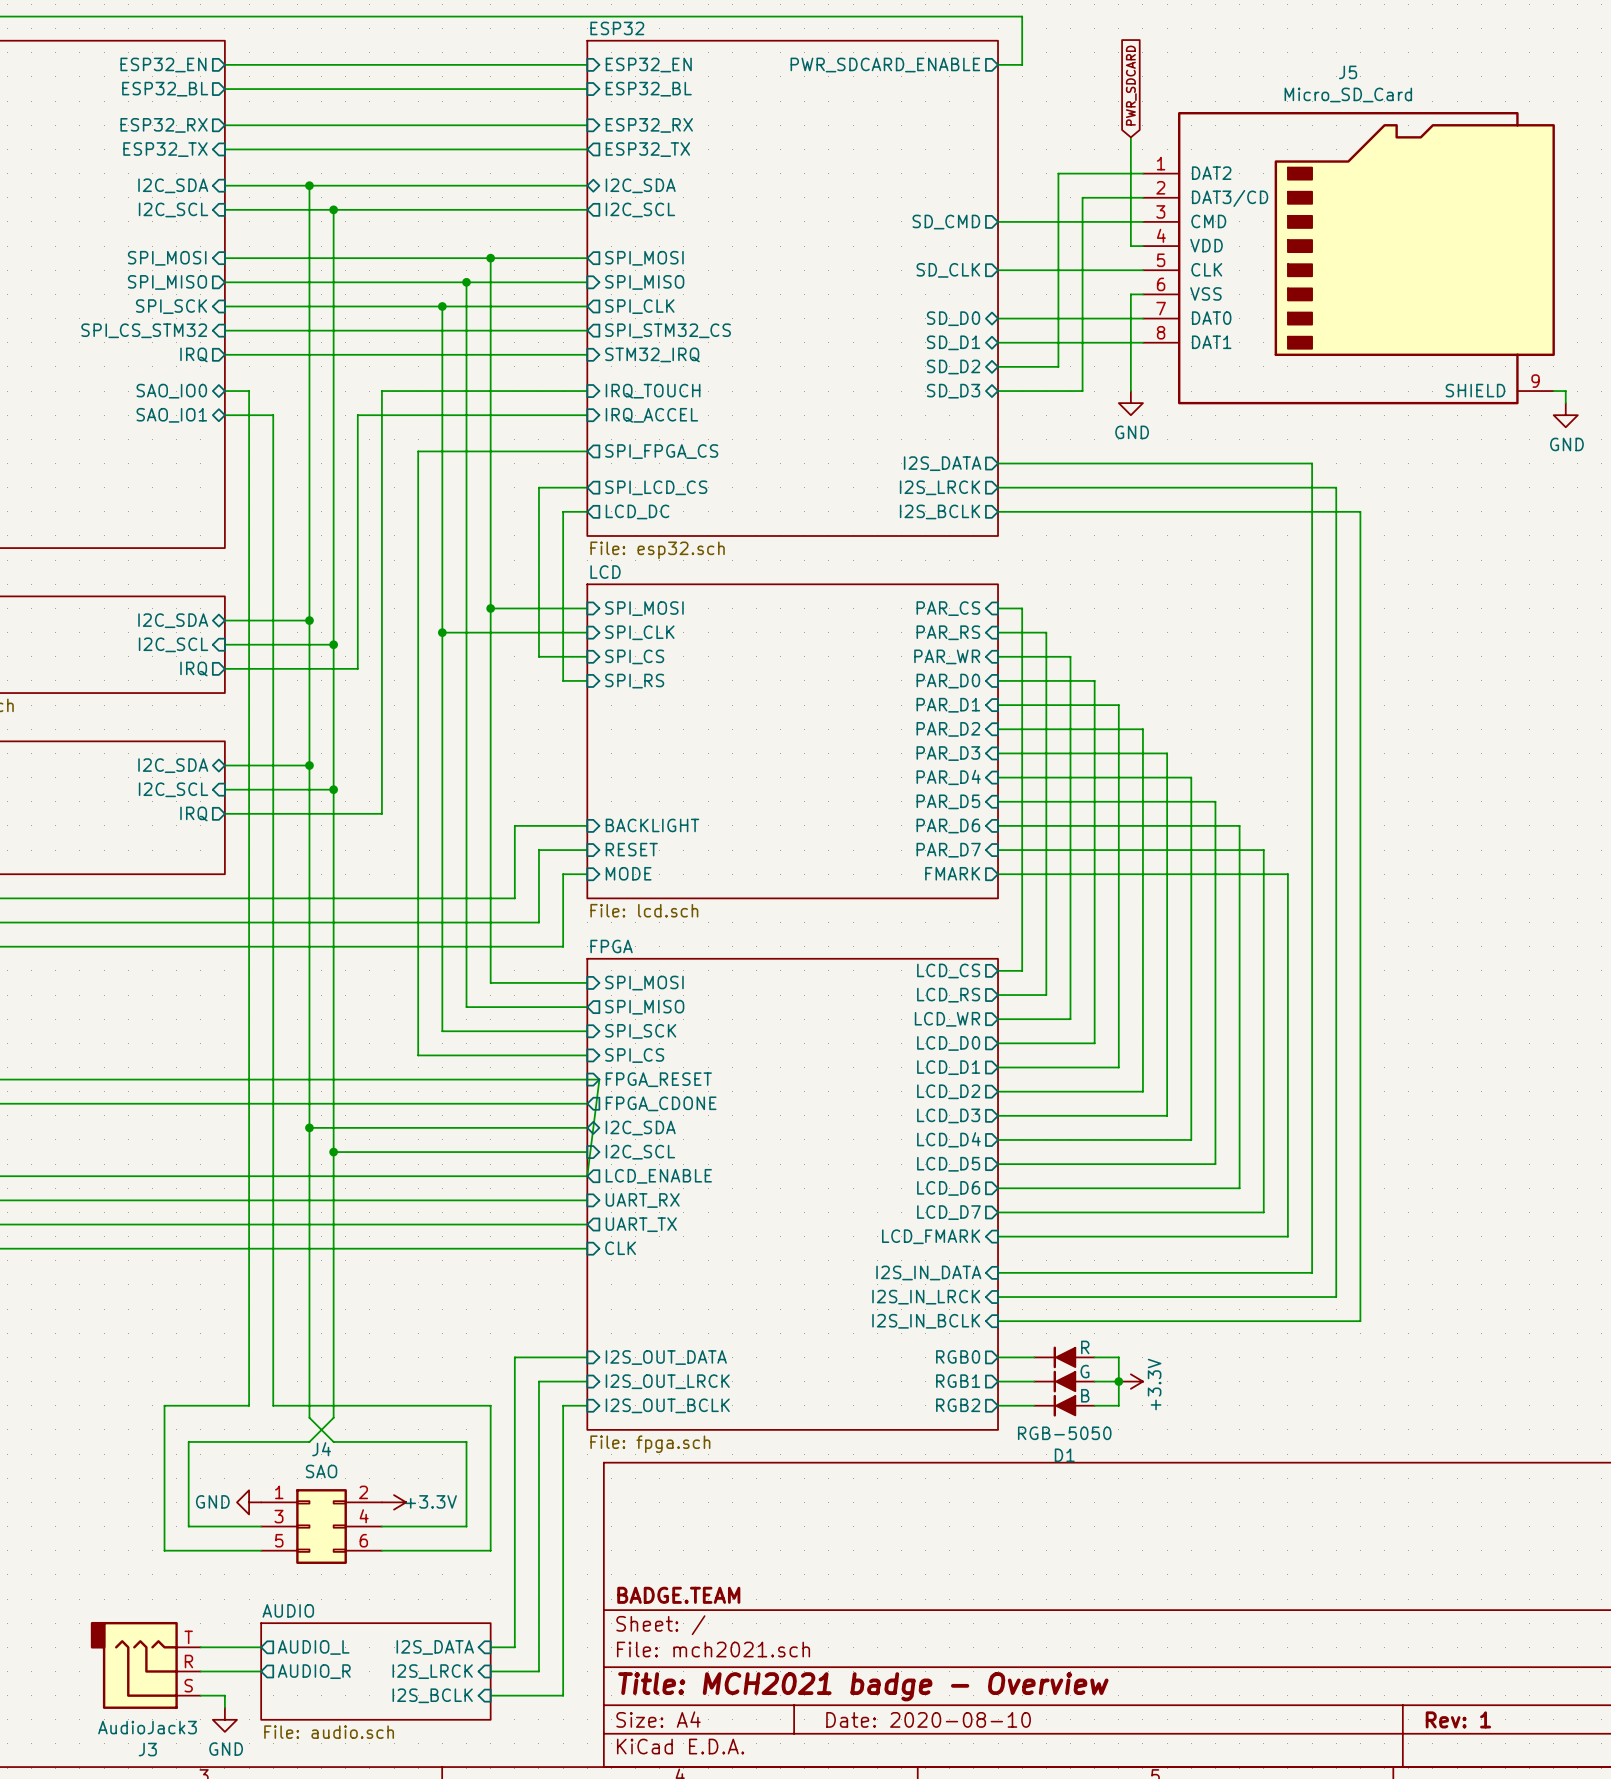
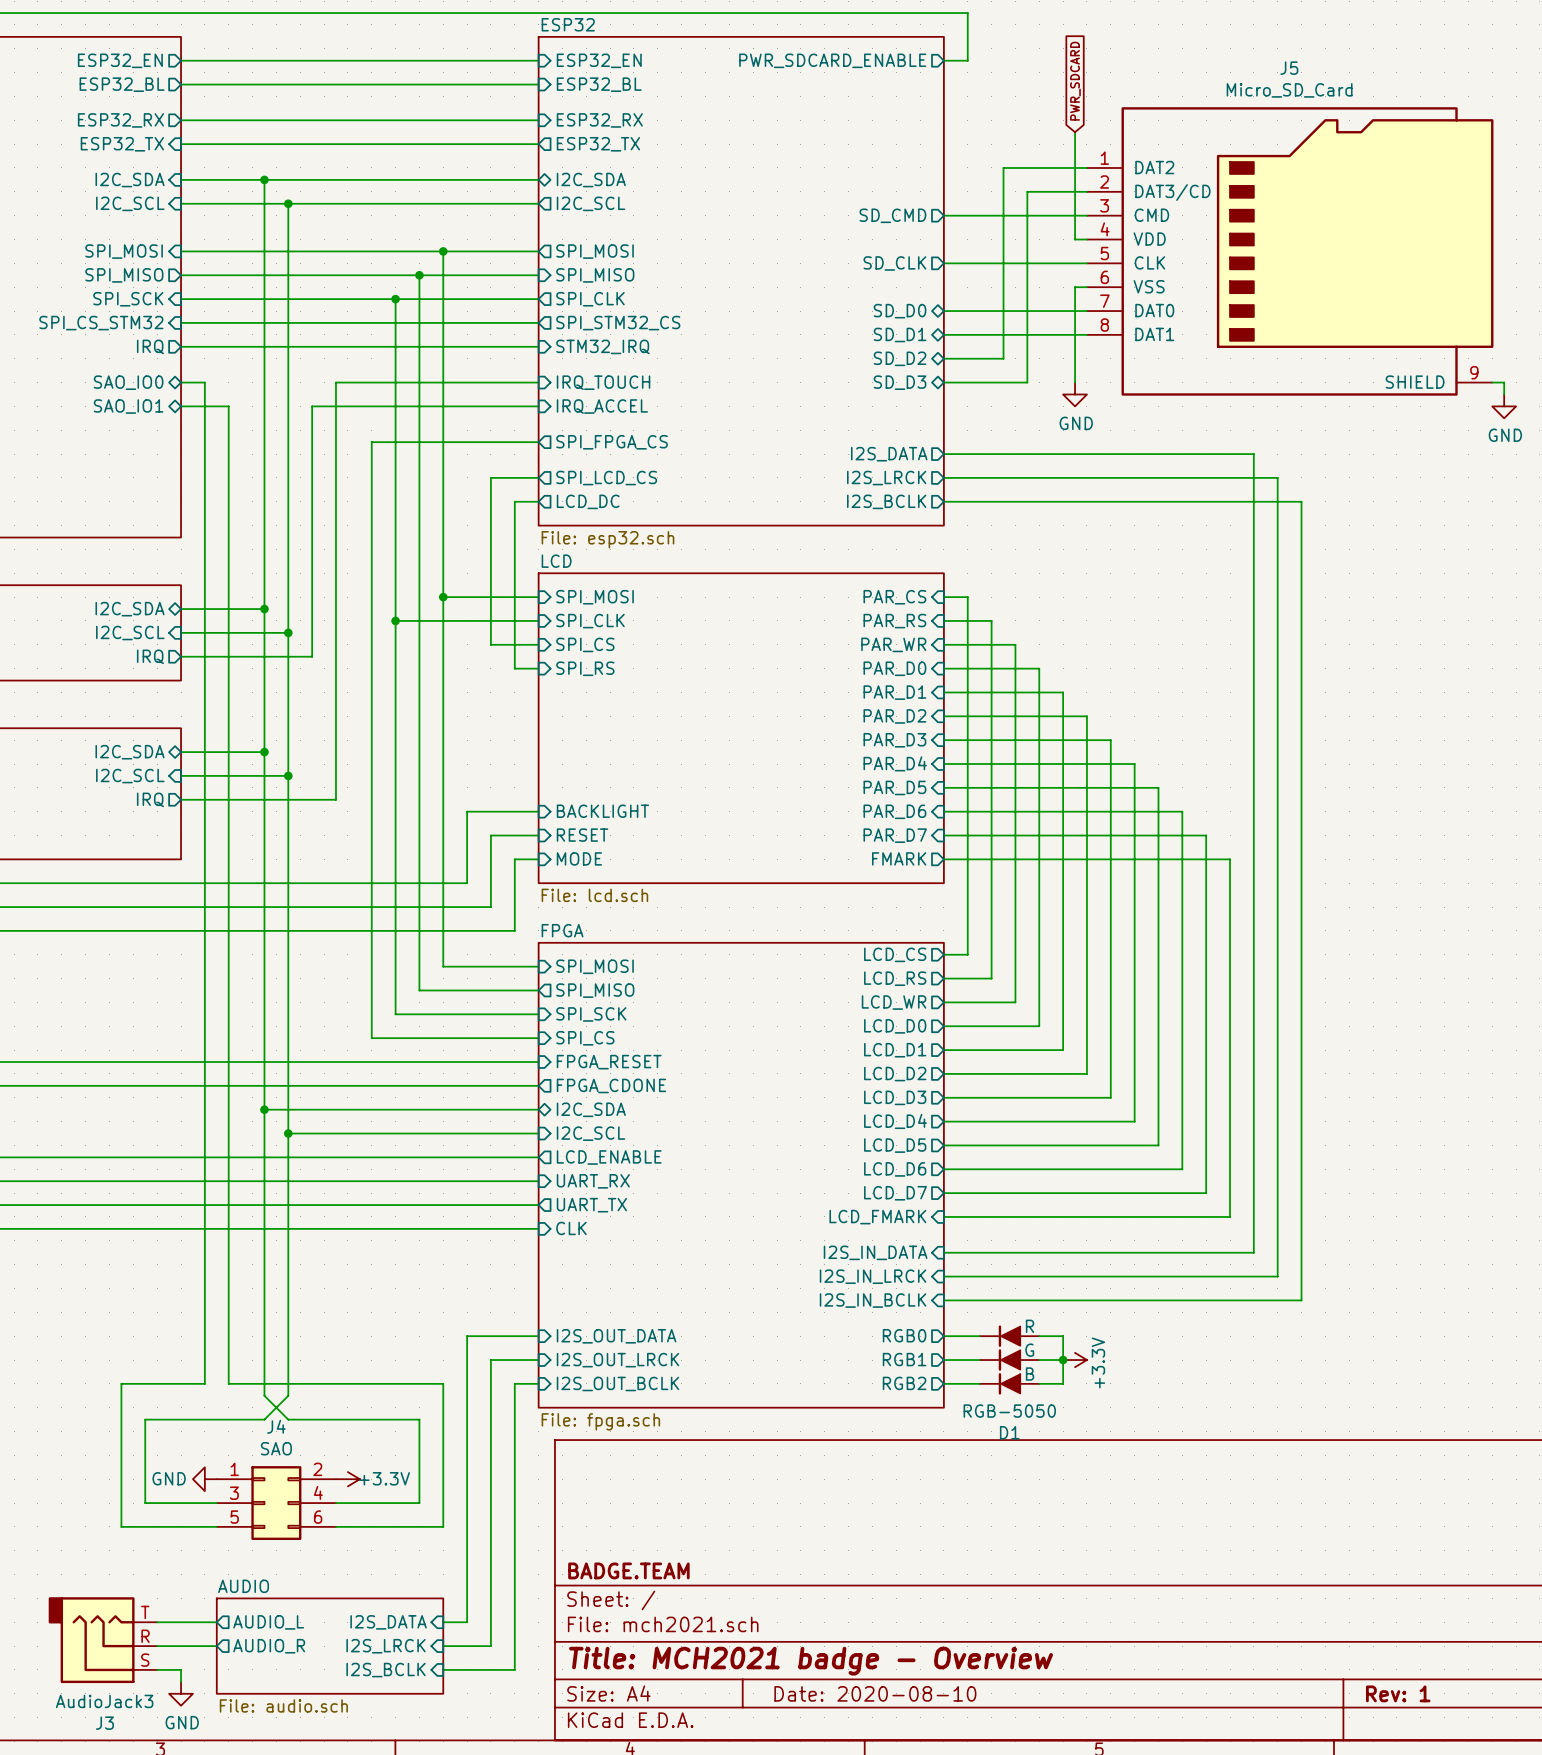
wire: (587, 1079) (599, 1079) (587, 1176) -> none

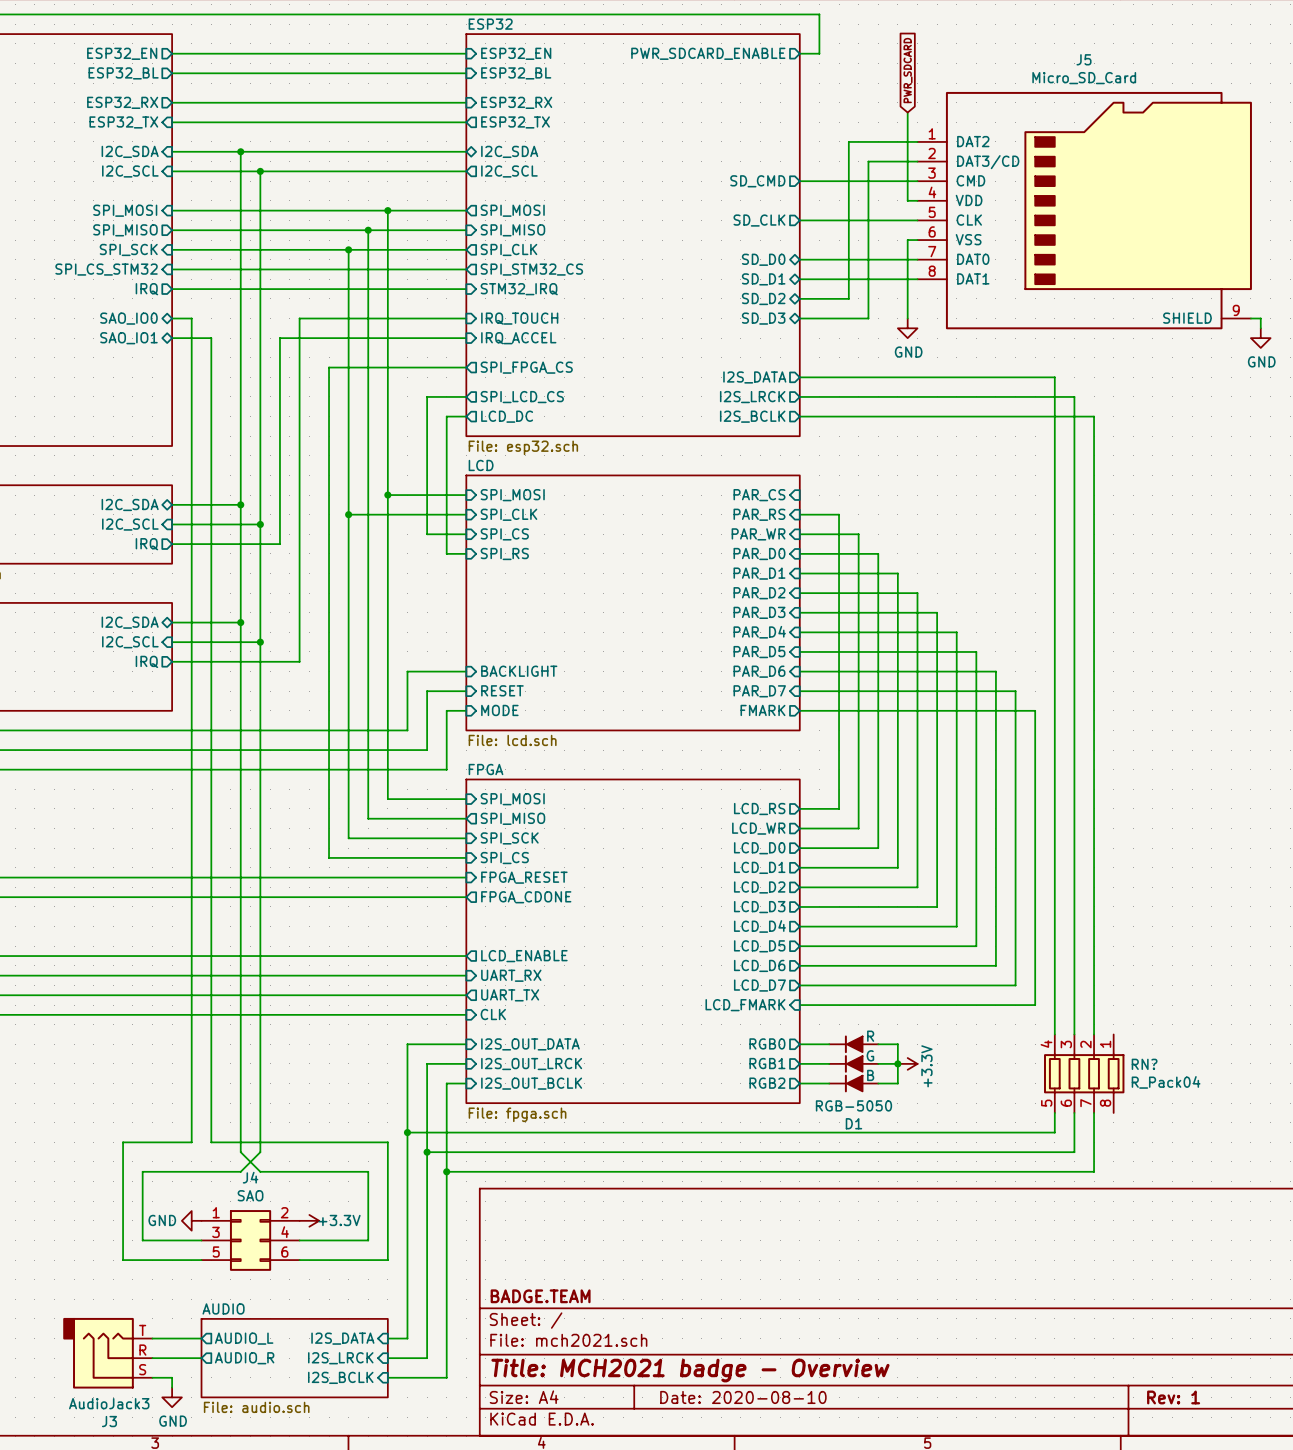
wire: (943, 597) (967, 597) (967, 954) (943, 954) -> none
sheet pin: LCD_CS (895, 954) -> none
wire: (264, 1109) (538, 1109) -> none
junction: (264, 1109) -> none
sheet pin: I2C_SDA (591, 1109) -> none
wire: (288, 1133) (538, 1133) -> none
junction: (288, 1133) -> none
sheet pin: I2C_SCL (591, 1133) -> none
sheet FPGA: none -> File: fpga.sch (633, 941)
sheet FPGA: File: fpga.sch (741, 1175) -> none
sheet pin: I2S_IN_DATA (875, 1252) -> none
wire: (943, 1252) (1253, 1252) -> none
wire: (1277, 1252) (1277, 1276) (943, 1276) -> none
wire: (1301, 1252) (1301, 1300) (943, 1300) -> none
sheet pin: I2S_IN_LRCK (873, 1276) -> none
junction: none -> (897, 1063)
sheet pin: I2S_IN_BCLK (873, 1300) -> none
RN?: none -> R_Pack04 (1084, 1073)
sheet pin position: RGB0 (904, 1335) -> RGB0 (767, 1043)
wire: (467, 1336) (538, 1336) -> (407, 1103) (407, 1044) (466, 1044)
sheet pin position: I2S_OUT_DATA (616, 1336) -> I2S_OUT_DATA (530, 1044)
wire: (943, 1336) (979, 1336) -> (799, 1044) (829, 1044)
wire: (1039, 1336) (1063, 1336) (1063, 1383) (1039, 1383) -> (878, 1044) (897, 1044) (897, 1083) (878, 1083)
wire: none -> (1054, 1112) (1054, 1132) (407, 1132)
wire: none -> (1074, 1112) (1074, 1152) (427, 1152)
wire: none -> (1094, 1112) (1094, 1171) (446, 1171)
sheet pin position: RGB1 (904, 1359) -> RGB1 (767, 1063)
wire: (490, 1360) (538, 1360) -> (427, 1122) (427, 1063) (466, 1063)
sheet pin position: I2S_OUT_LRCK (618, 1360) -> I2S_OUT_LRCK (531, 1064)
wire: (943, 1360) (979, 1360) -> (799, 1063) (829, 1063)
D1 position: (1009, 1360) -> (853, 1063)
wire: (1039, 1360) (1063, 1360) -> (878, 1063) (897, 1063)
junction: (1063, 1360) -> none
power symbol position: +3.3V (1075, 1360) -> +3.3V (907, 1063)
junction: none -> (407, 1132)
wire: (514, 1383) (538, 1383) -> (446, 1142) (446, 1083) (466, 1083)
sheet pin position: I2S_OUT_BCLK (618, 1383) -> I2S_OUT_BCLK (531, 1083)
sheet pin position: RGB2 (904, 1383) -> RGB2 (767, 1083)
wire: (943, 1383) (979, 1383) -> (799, 1083) (829, 1083)
junction: none -> (427, 1152)
junction: none -> (446, 1171)

